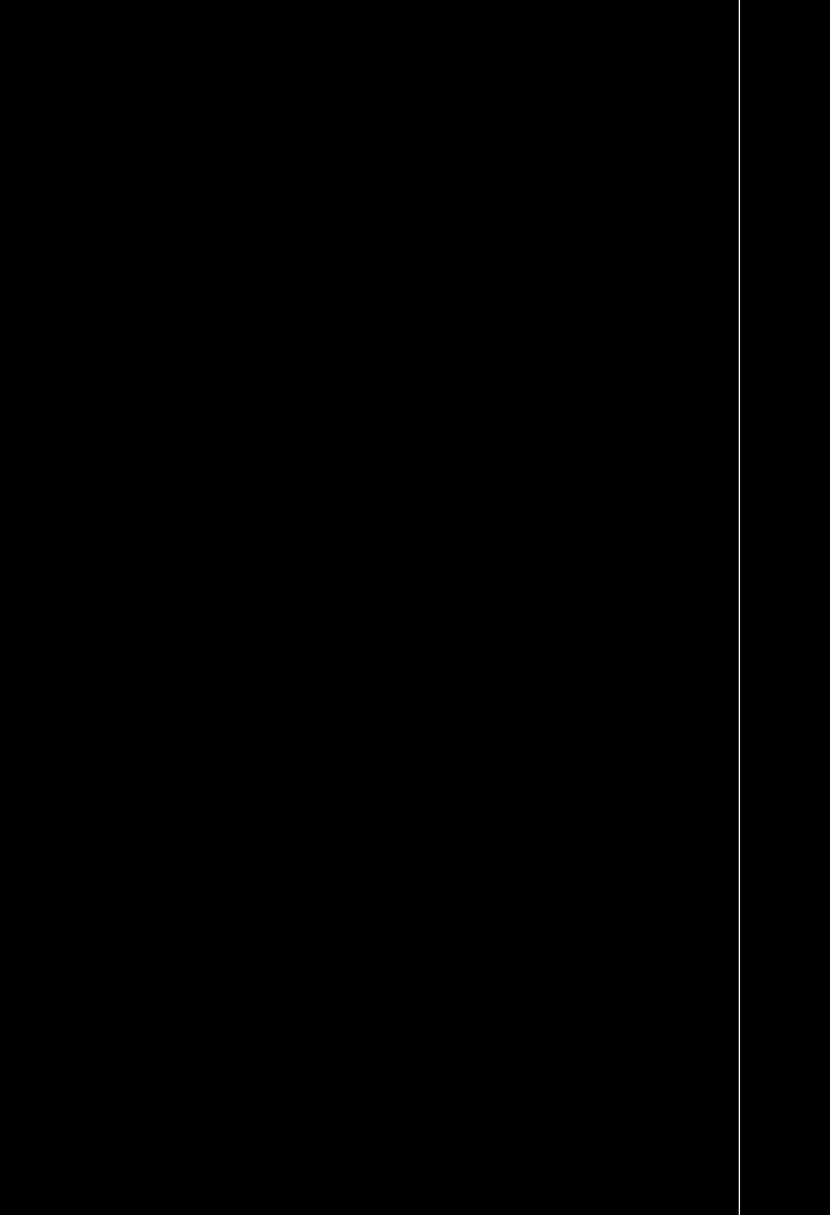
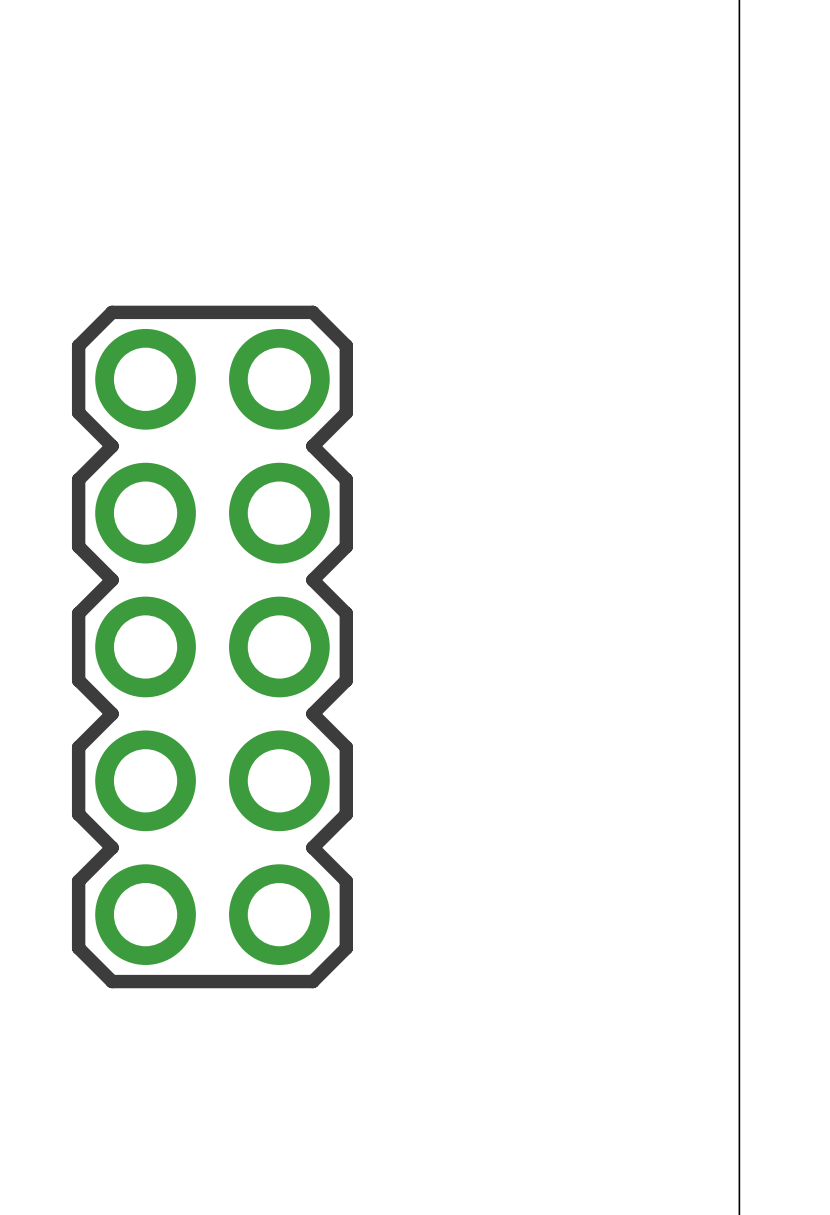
part: none -> (212, 646)

